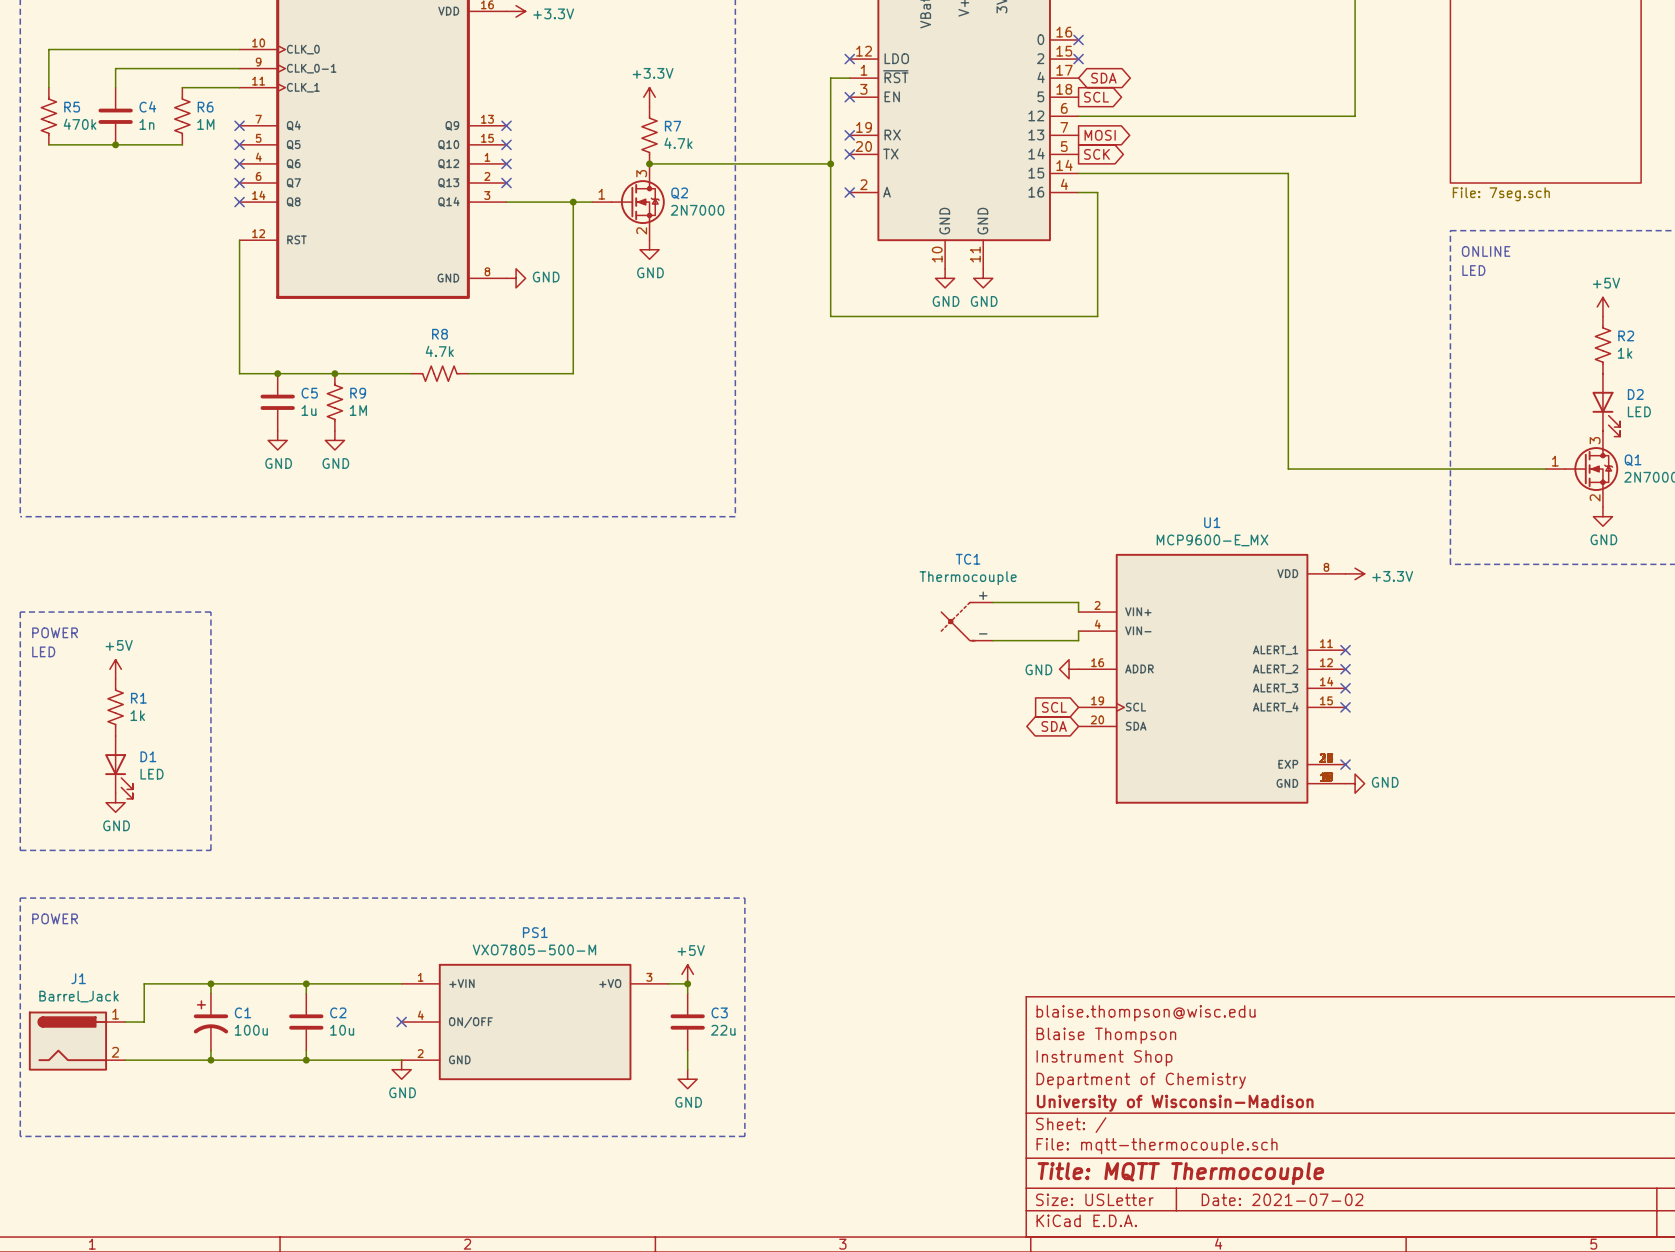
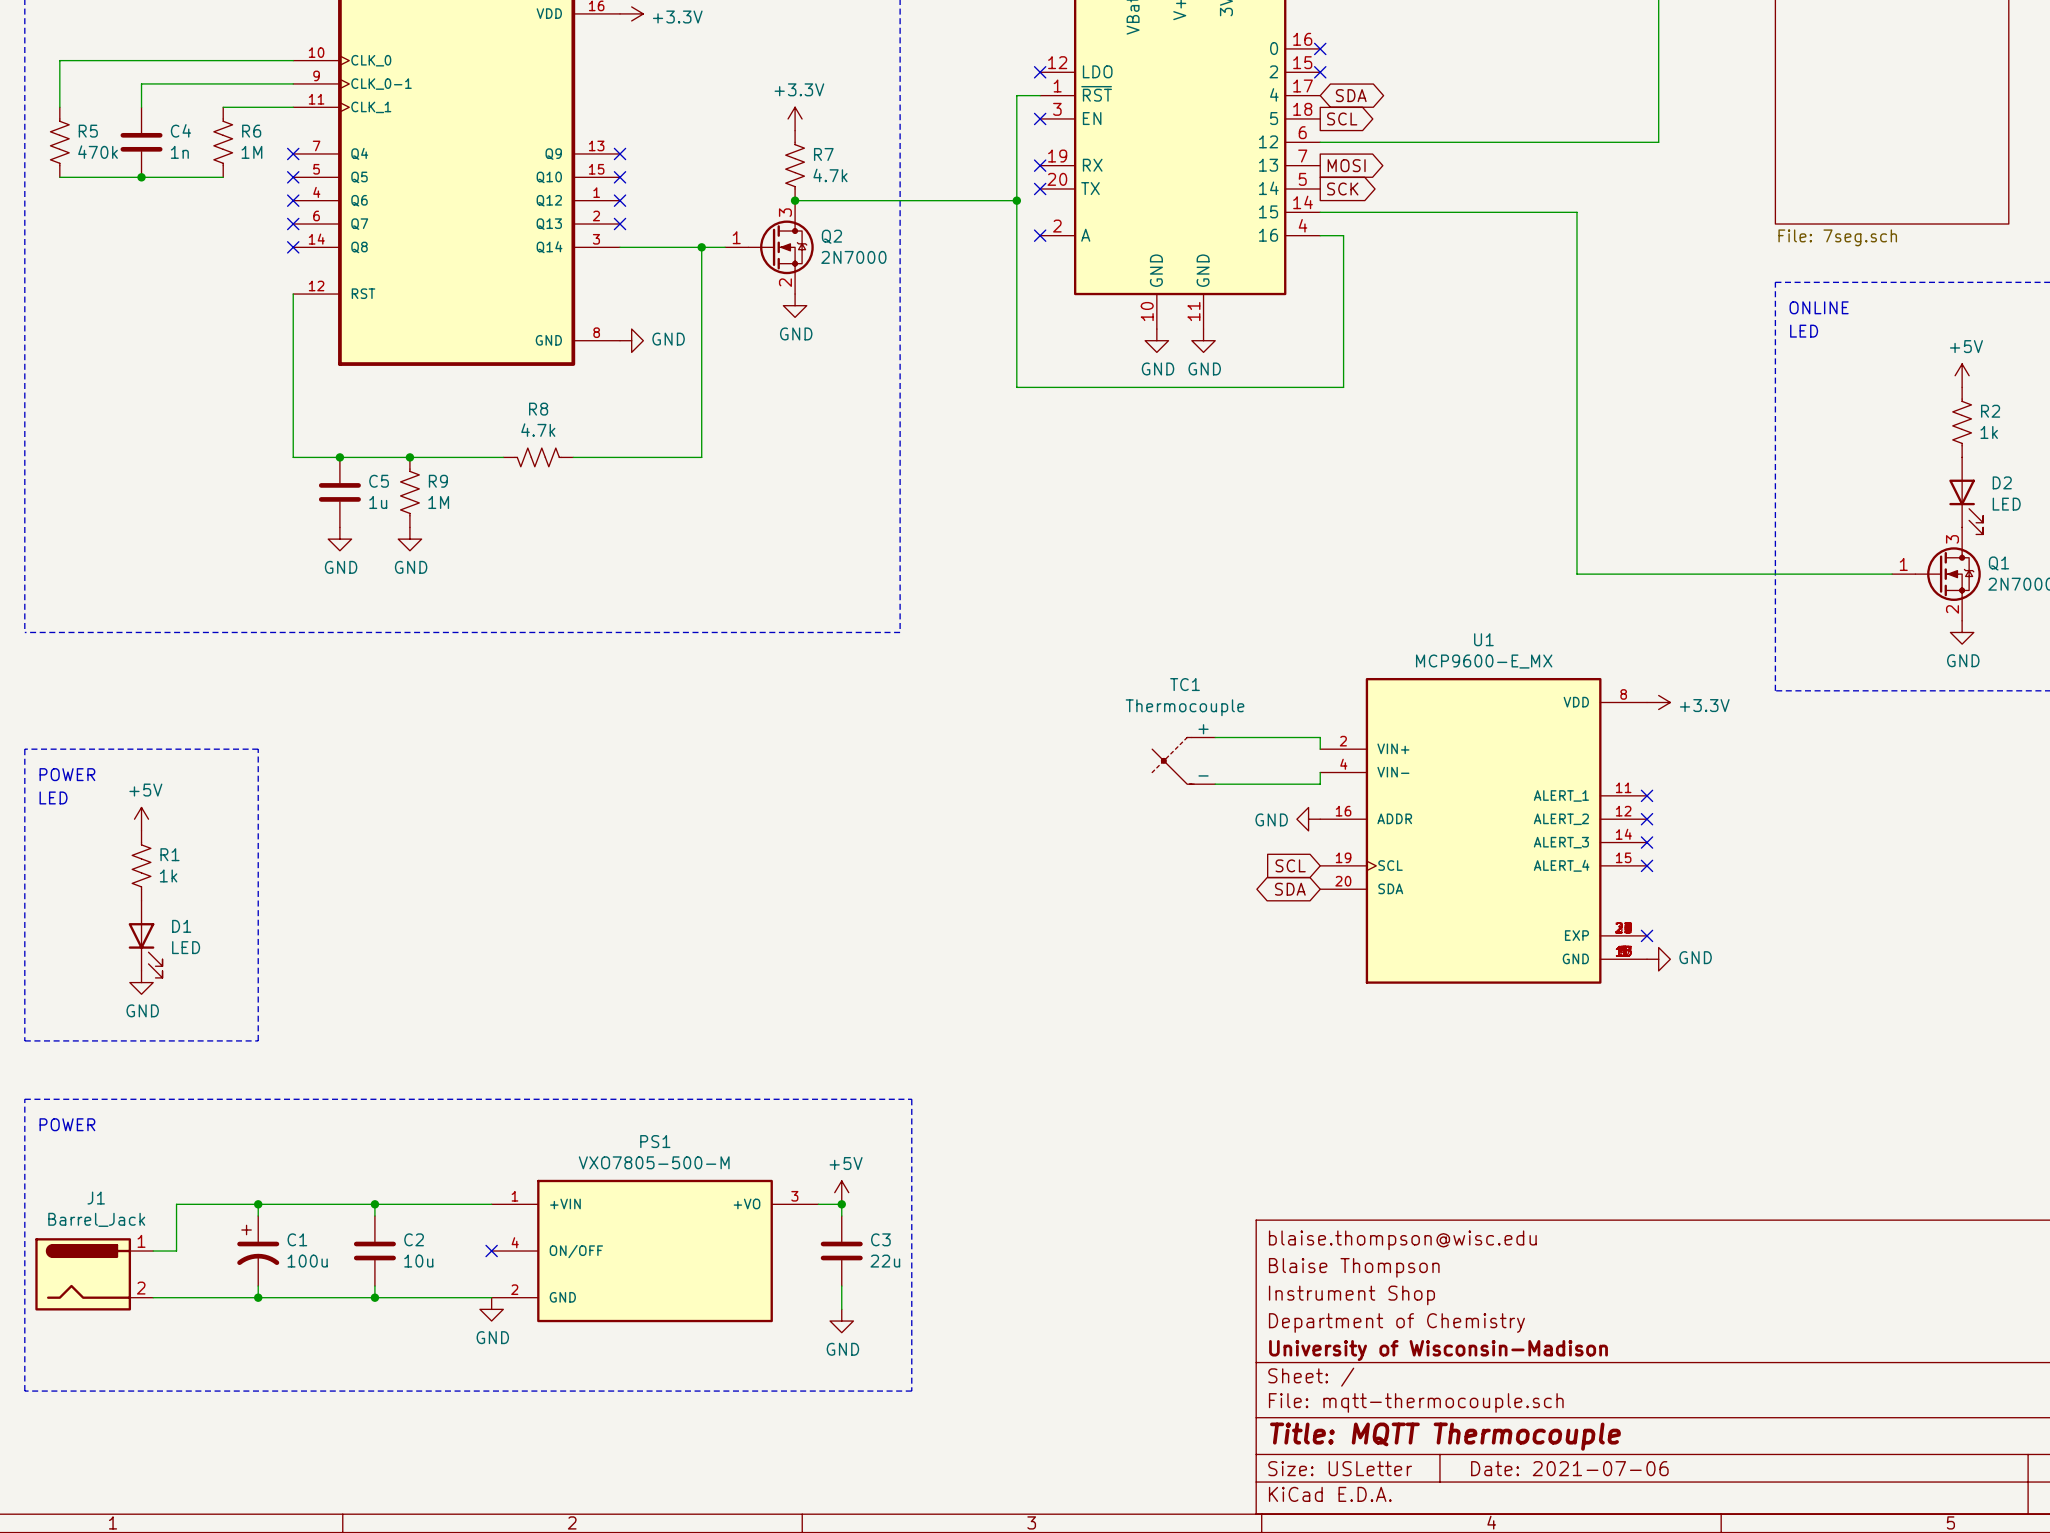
title block: Date: 2021-07-02 (1282, 1199) -> Date: 2021-07-06 (1569, 1468)

